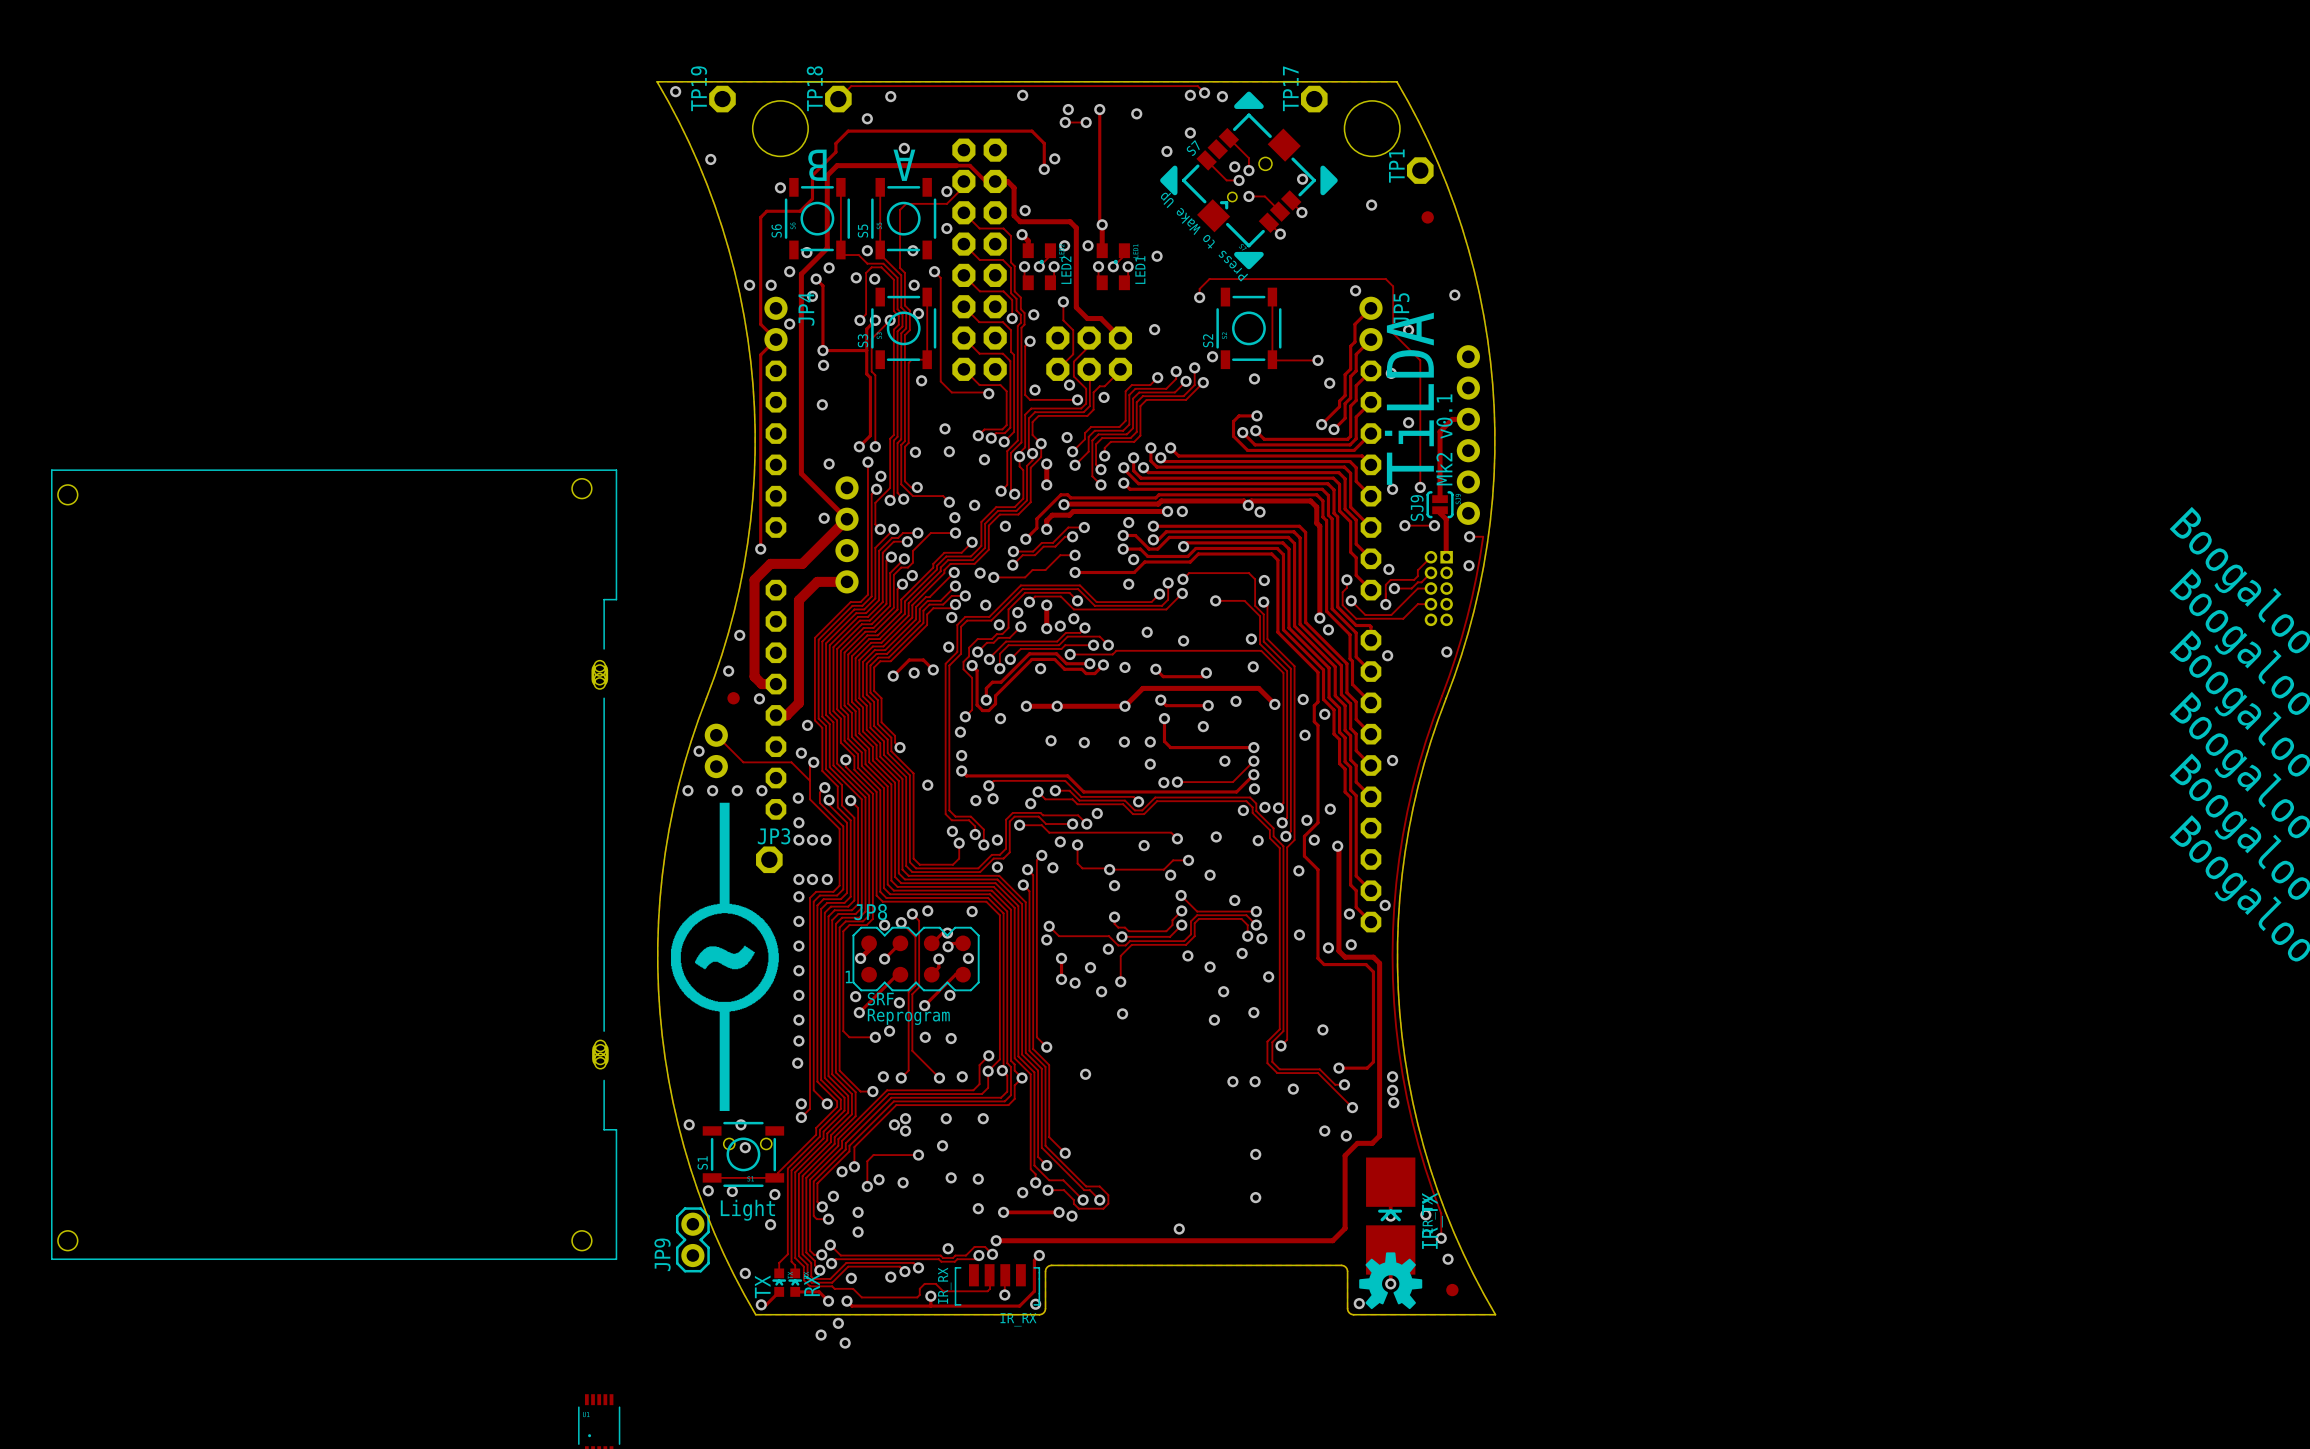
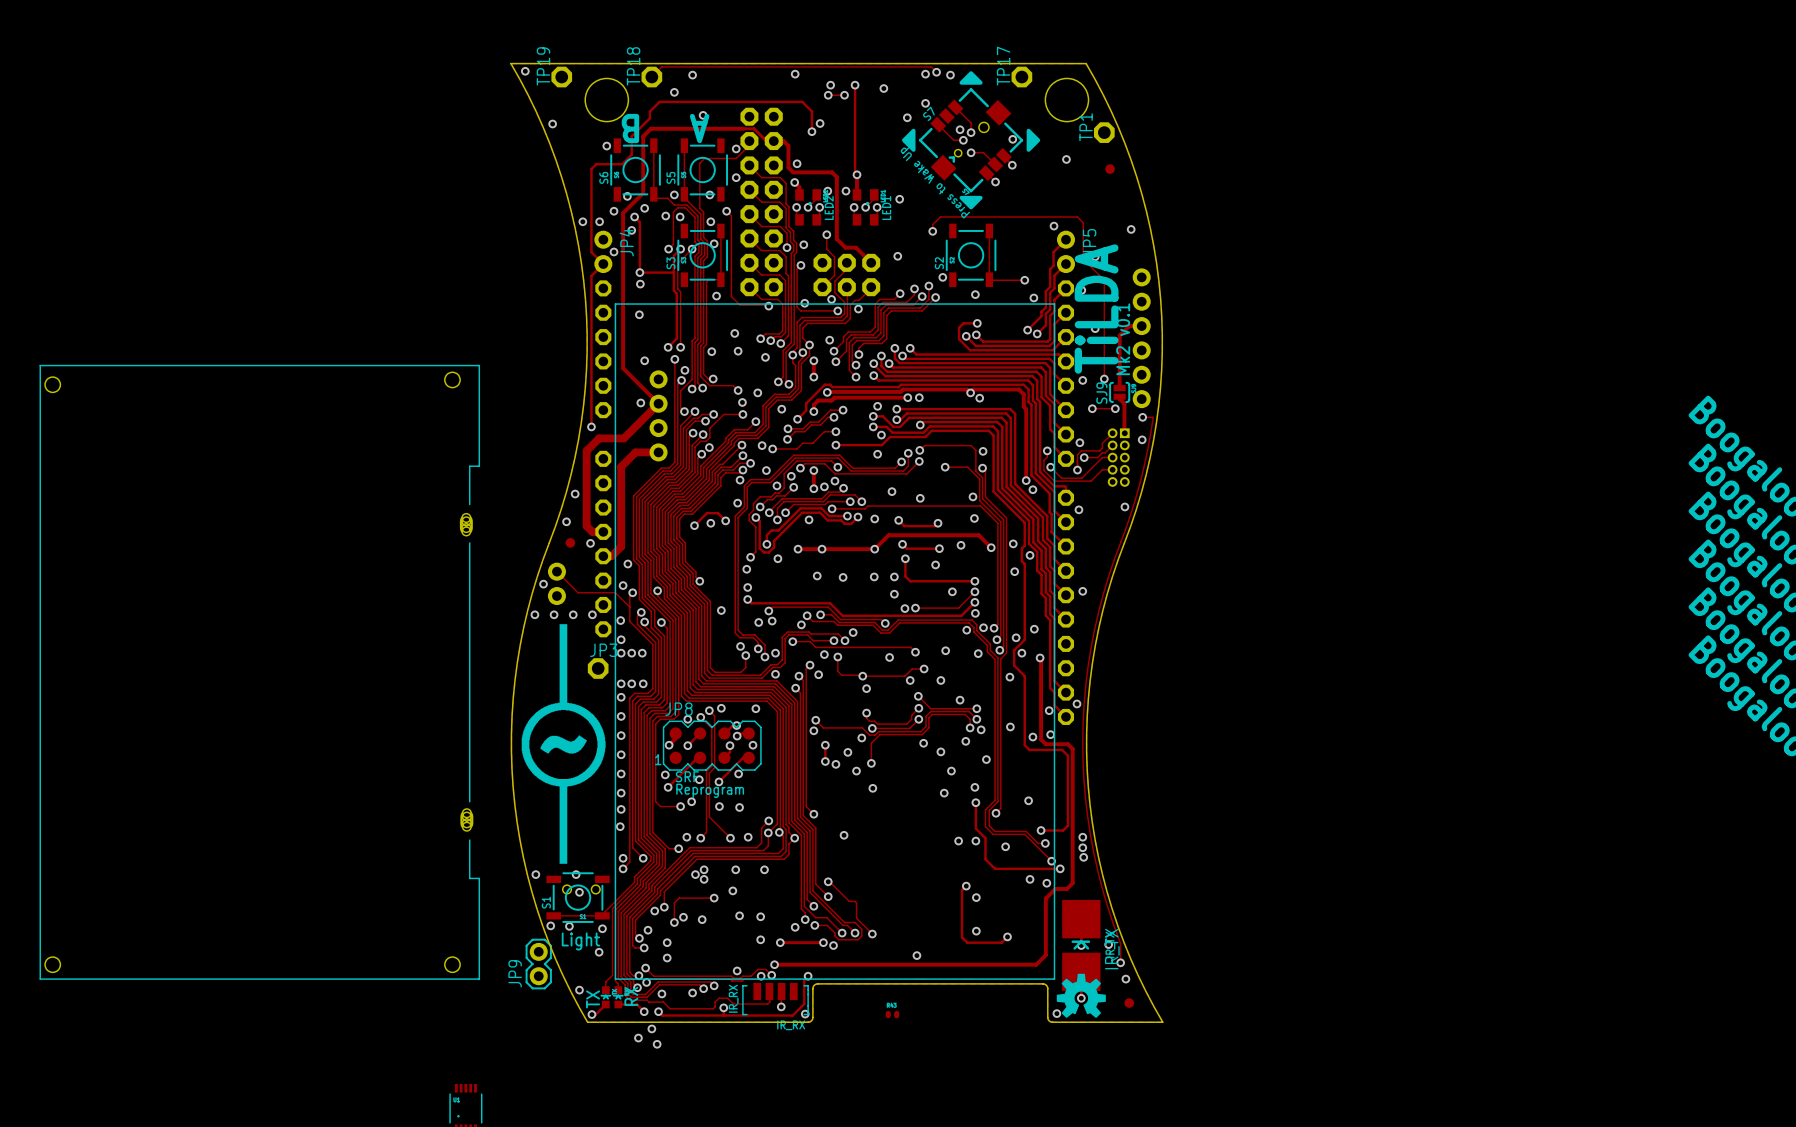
drawing: none -> [614, 303, 1056, 980]
track: none -> (975, 802) (975, 828) (985, 838) (985, 859) (995, 868) (1060, 868)
via: none -> (975, 802)
via: none -> (1060, 868)
track: none -> (828, 881) (849, 901) (856, 902) (856, 918) (872, 934)
via: none -> (828, 881)
track: none -> (966, 886) (961, 890) (961, 937) (967, 942) (1001, 942) (1007, 936)
via: none -> (966, 886)
via: none -> (872, 934)
via: none -> (1007, 936)
part: none -> (892, 1014)

